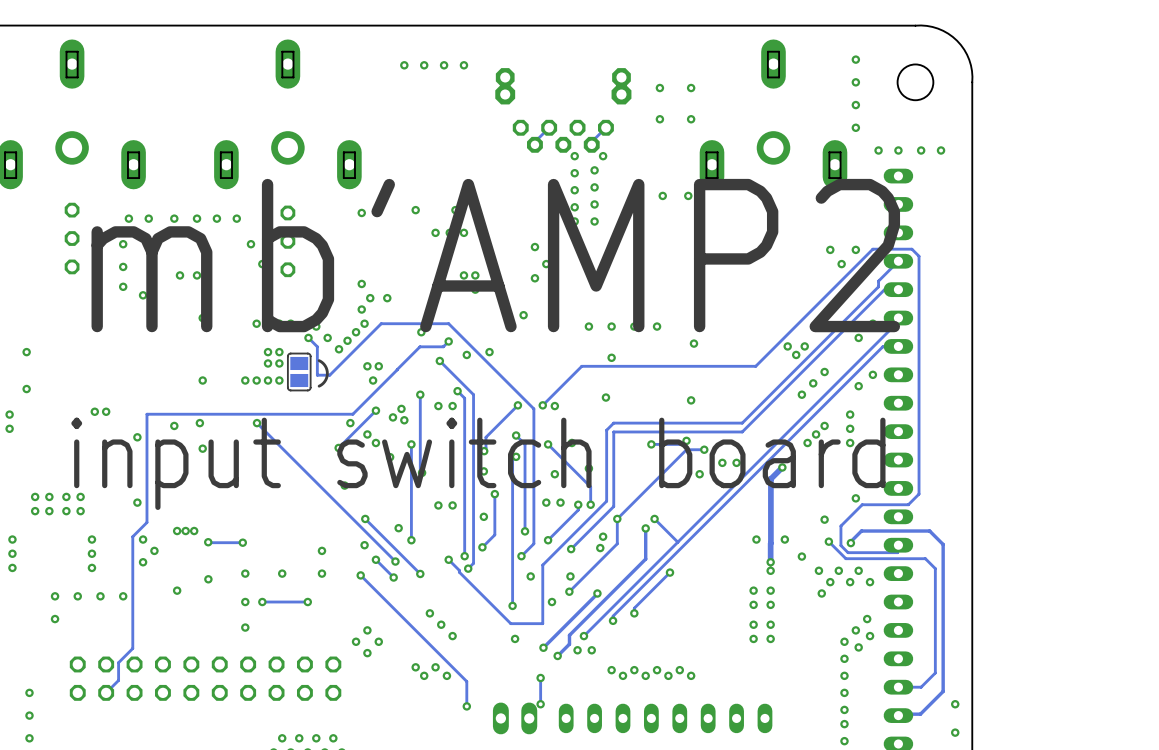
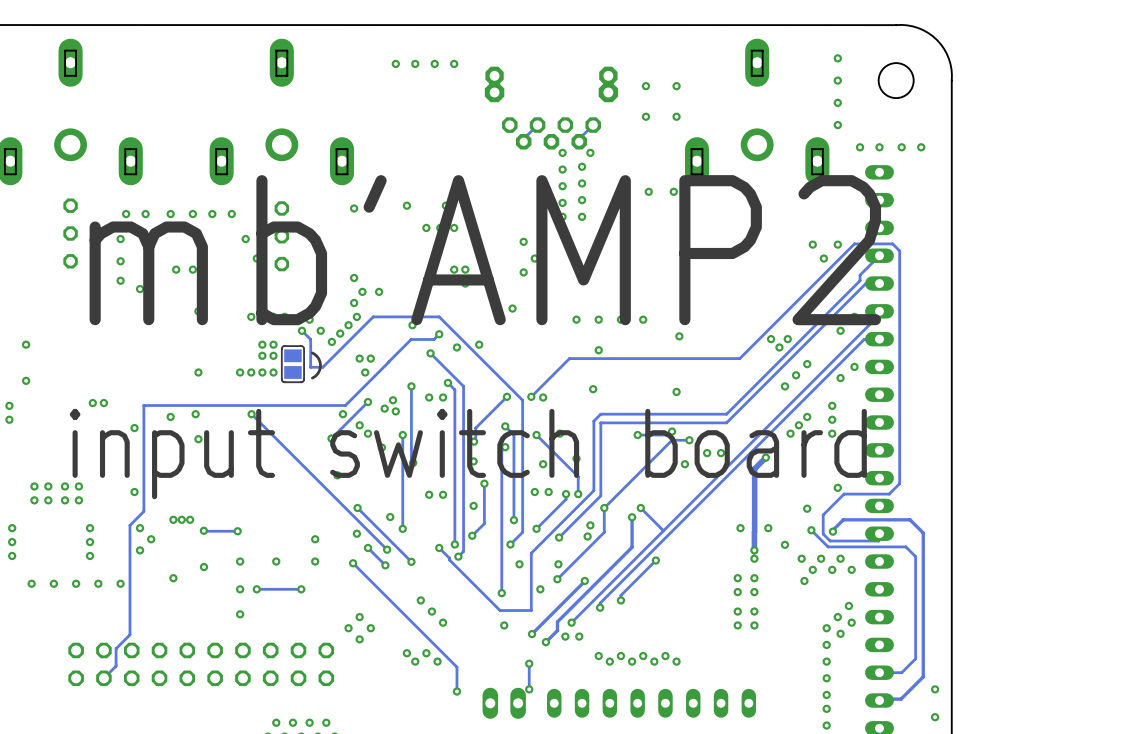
via position: (55, 619) -> (31, 583)
via: (29, 692) -> none
via: (29, 715) -> none
via: (29, 738) -> none

